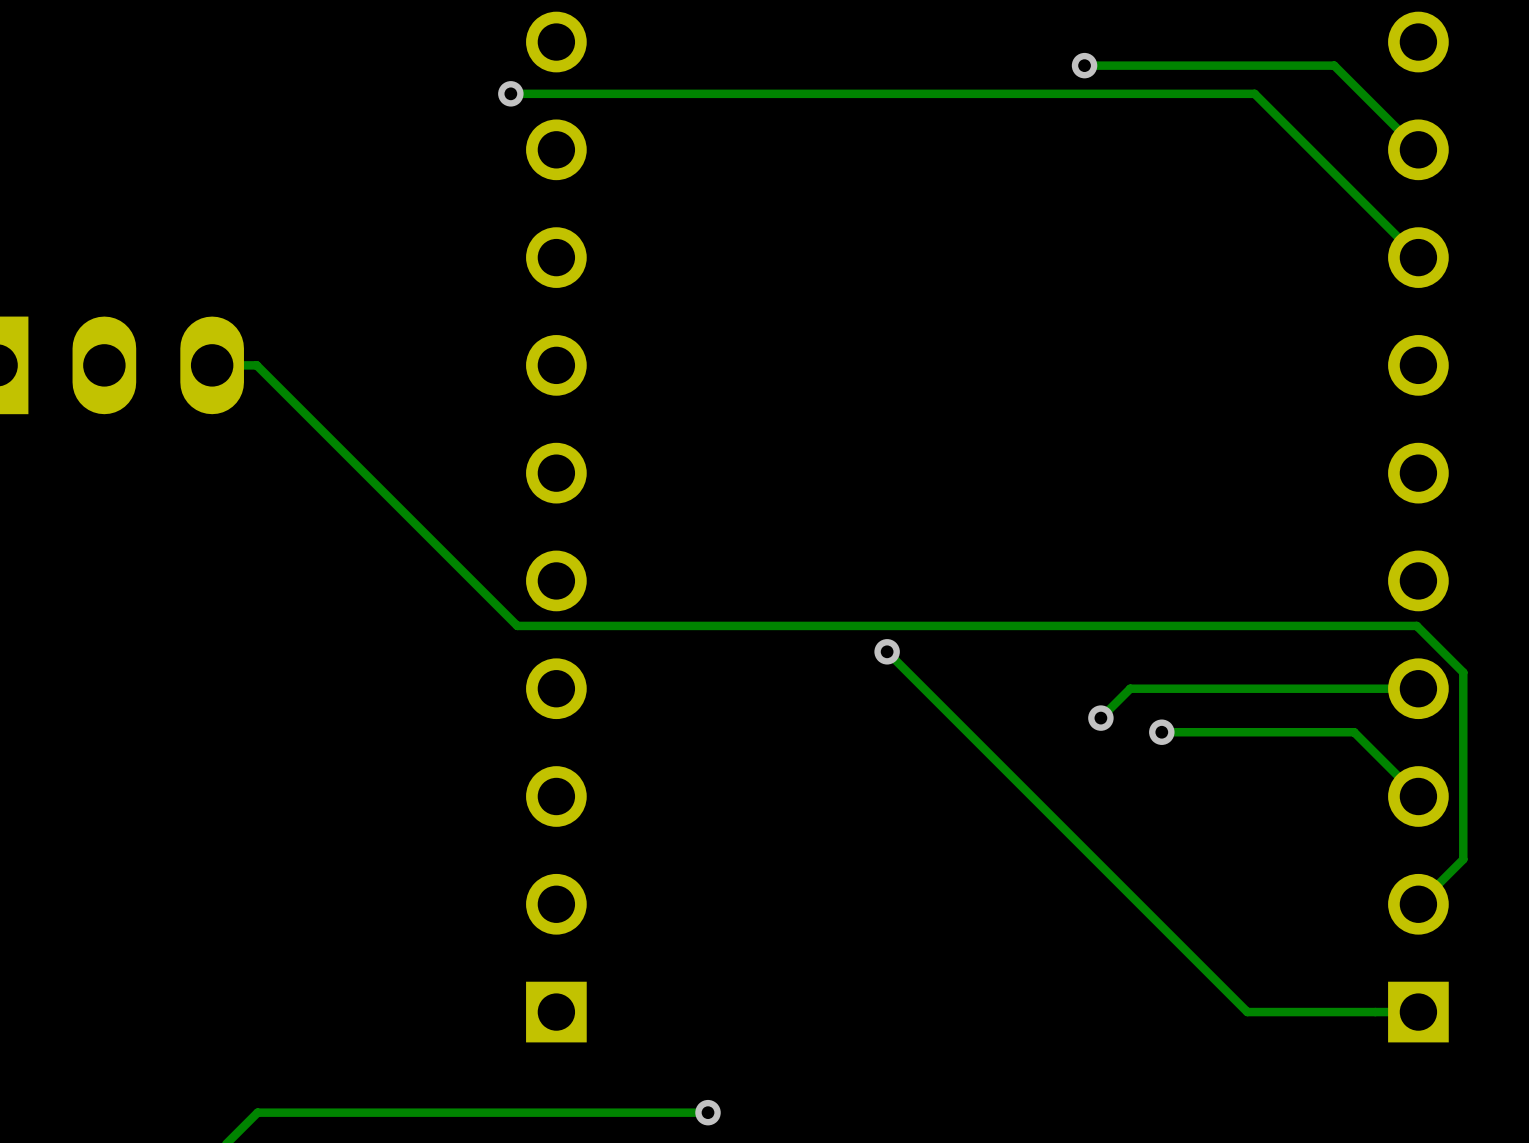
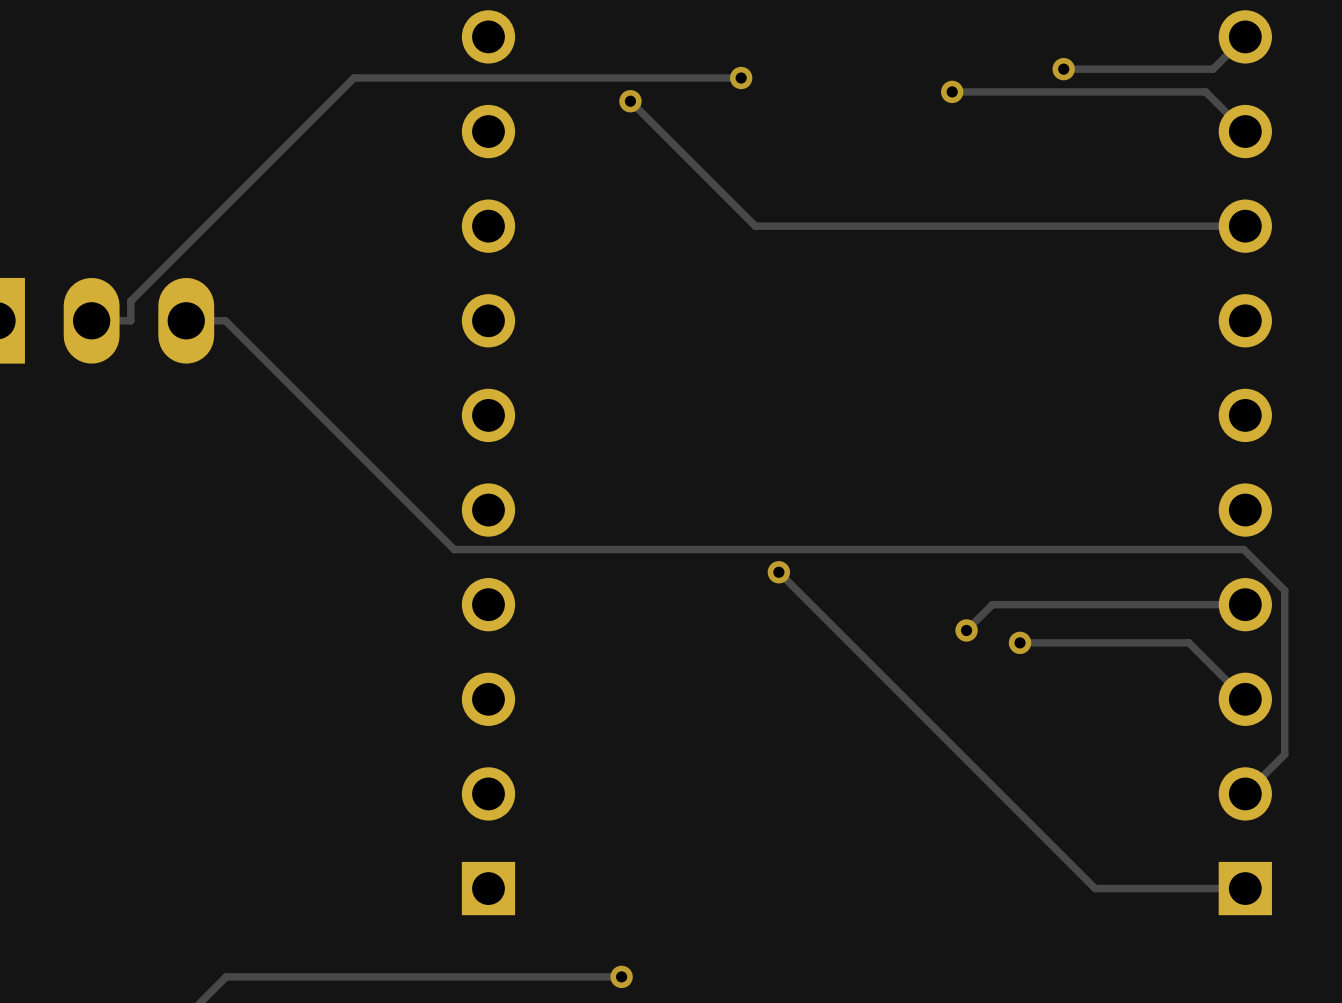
track: none -> (1245, 36) (1213, 69) (1063, 69)
track: (1084, 65) (1334, 65) (1373, 104) -> (952, 91) (1205, 91)
via position: (1084, 65) -> (952, 91)
via: none -> (1063, 69)
track: none -> (741, 78) (354, 78) (130, 301) (130, 320) (91, 320)
via: none -> (741, 78)
track: (510, 93) (1254, 93) (1418, 257) -> (630, 101) (755, 226) (1245, 226)
via: (510, 93) -> none
via: none -> (630, 101)

